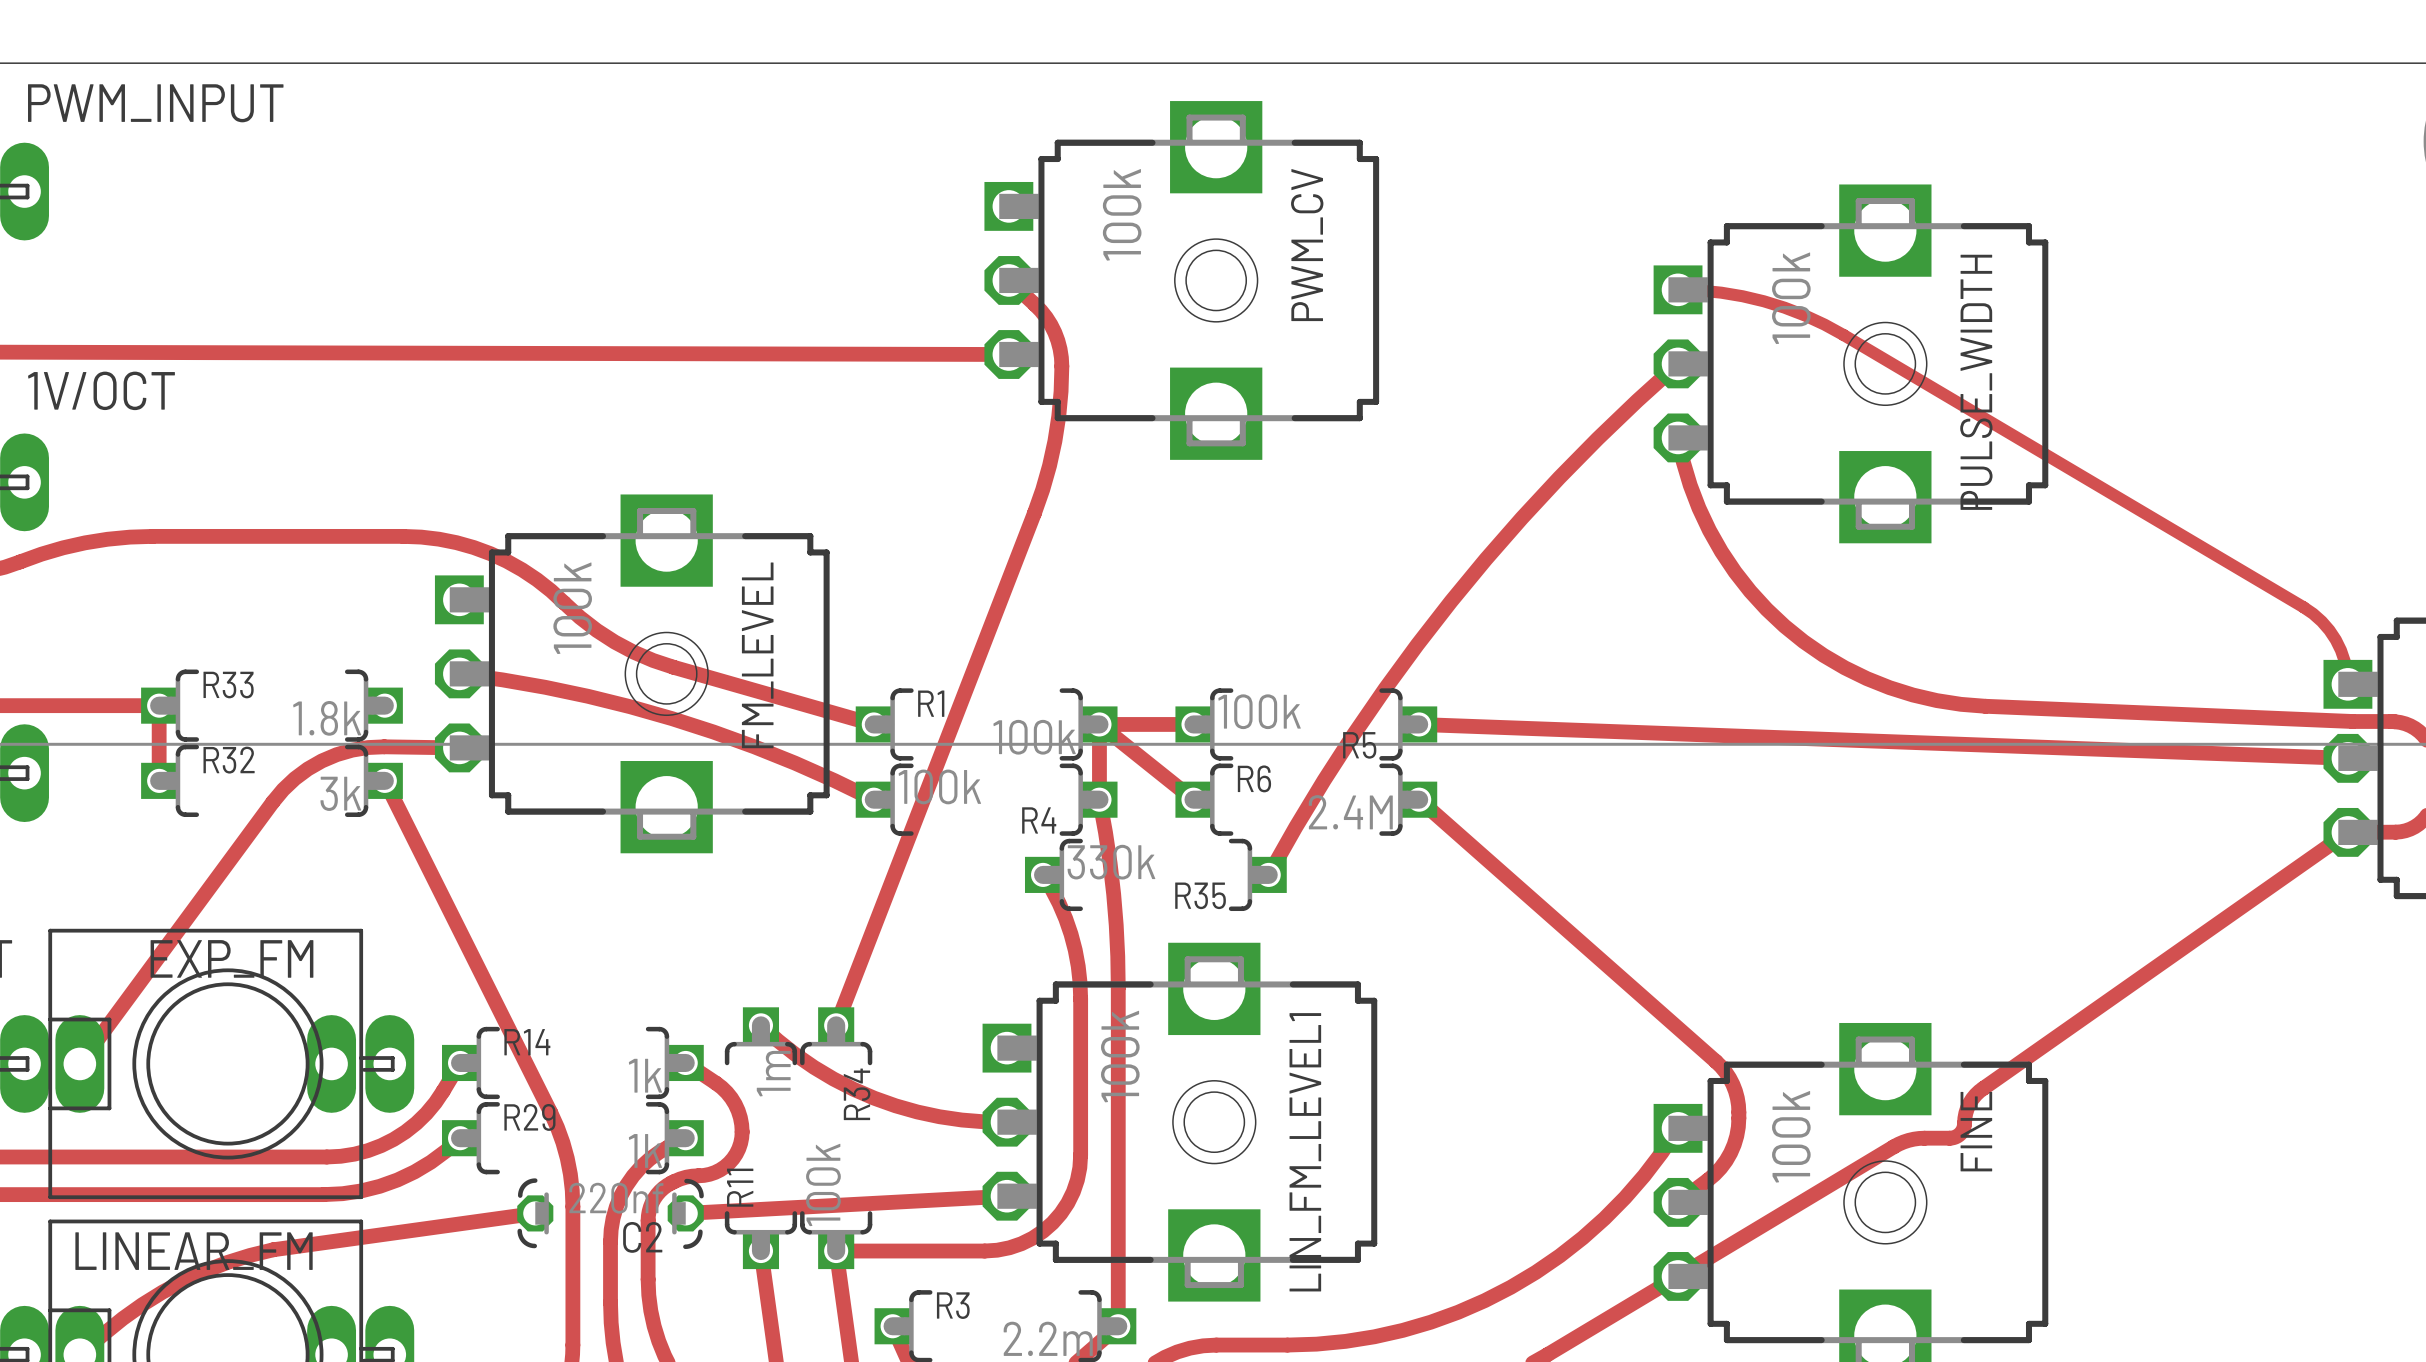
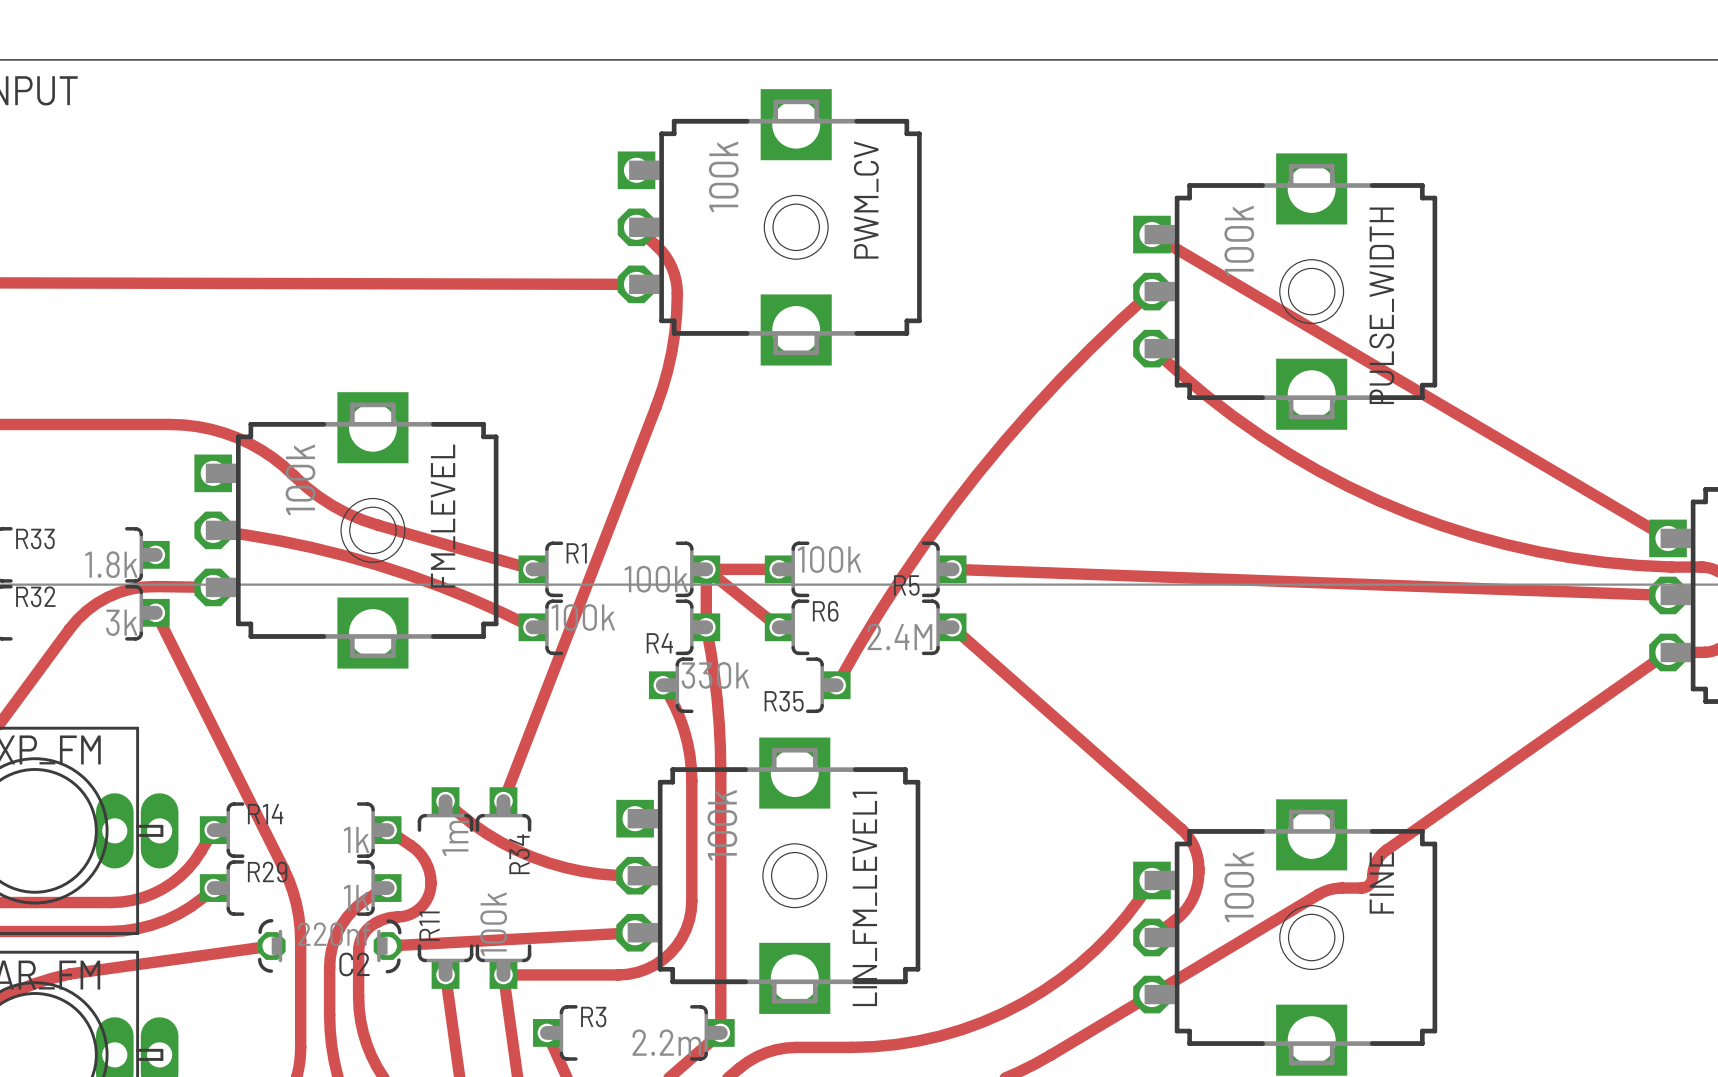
track: (1678, 289) (1721, 292) (1763, 301) (1804, 315) (1843, 335) (2313, 613) (2335, 639) (2344, 661) (2347, 684) -> (1151, 234) (1668, 538)
track: (1678, 437) (1683, 461) (1698, 508) (1721, 551) (1750, 591) (1784, 626) (1803, 641) (1823, 655) (1866, 678) (1912, 695) (1961, 704) (2352, 721) -> (1151, 348) (1206, 395) (1260, 435) (1318, 470) (1378, 500) (1472, 535) (1538, 551) (1604, 562) (1671, 567)

